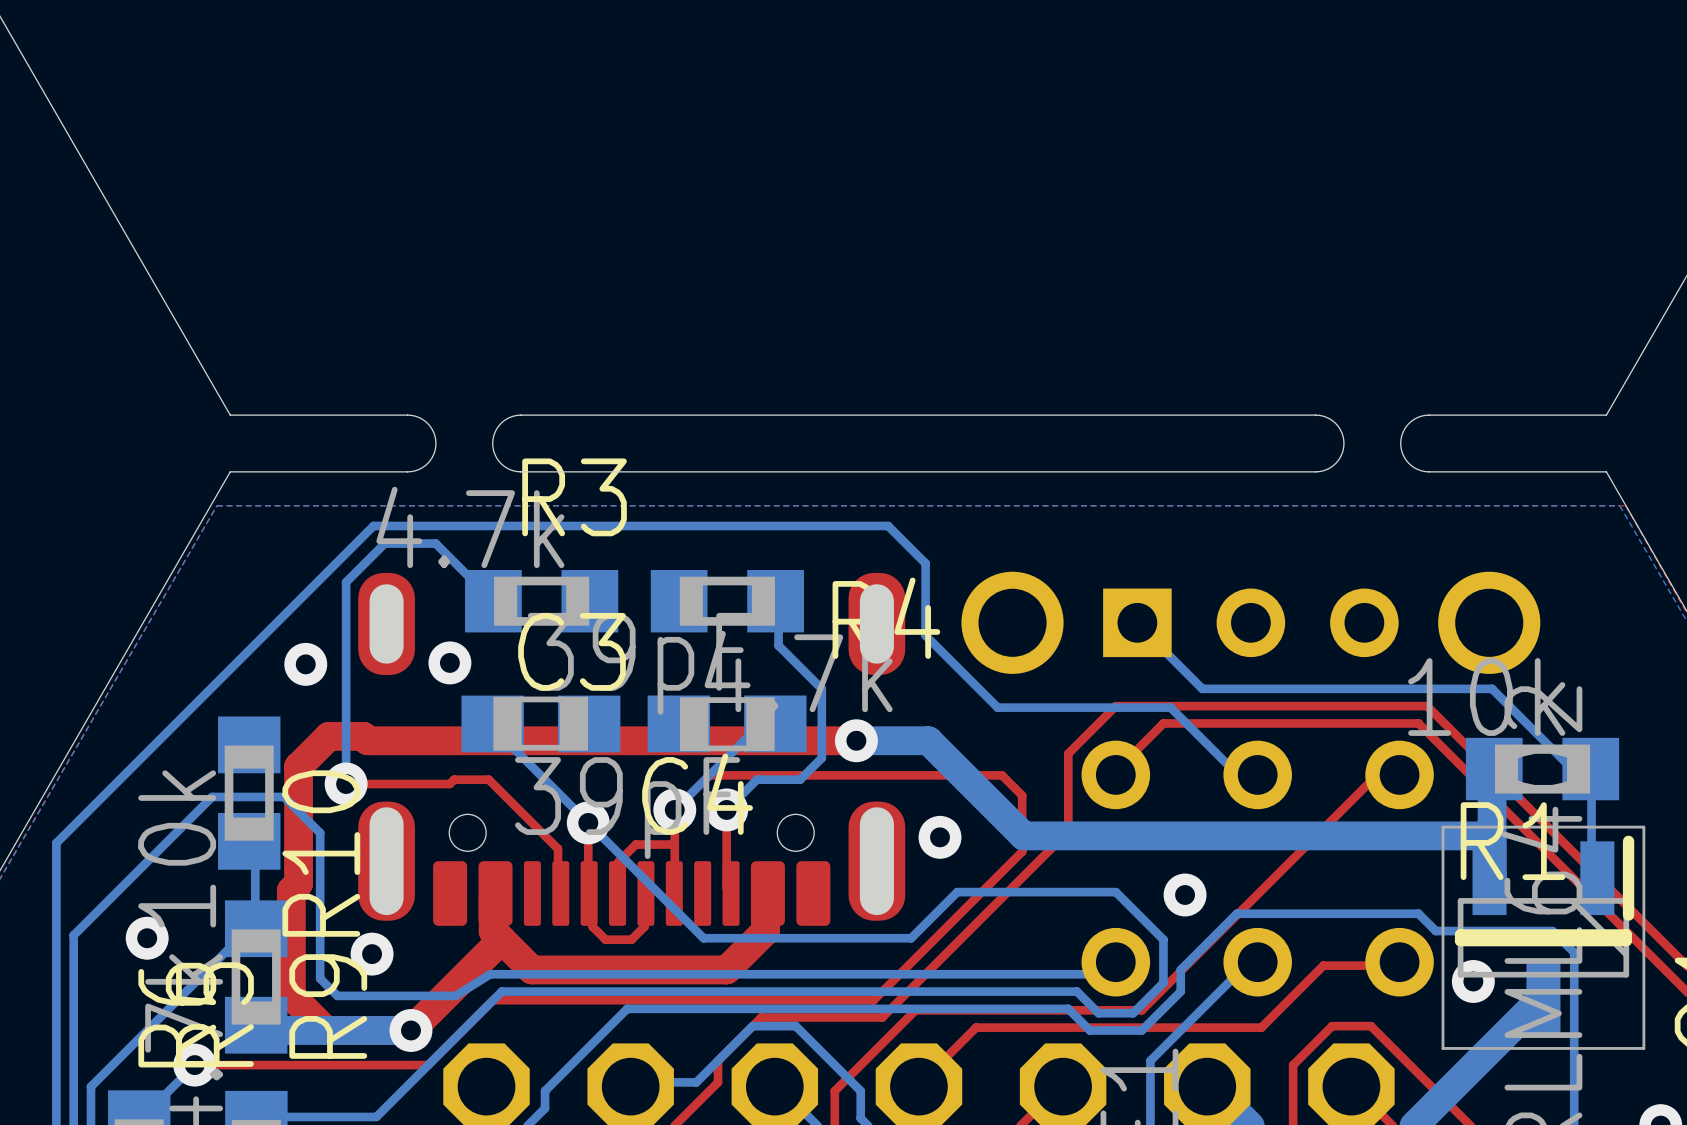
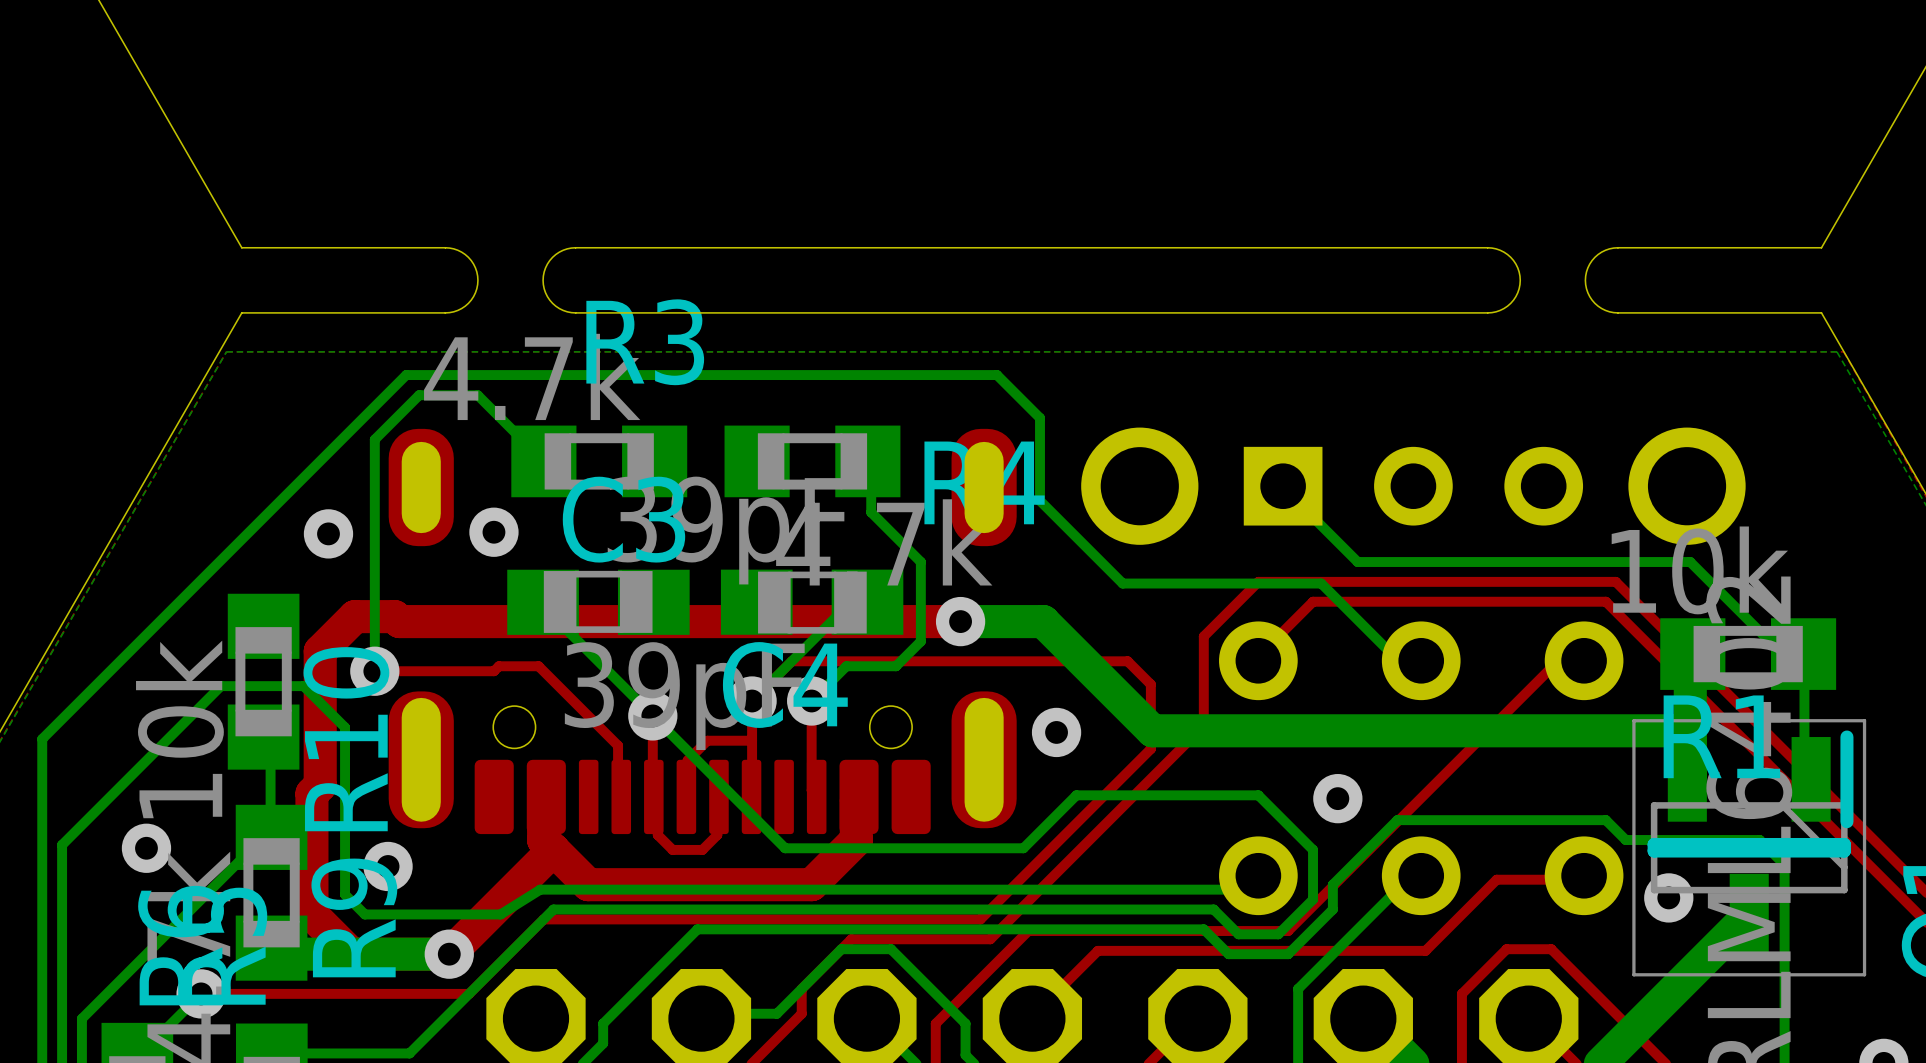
via position: (372, 954) -> (388, 866)

